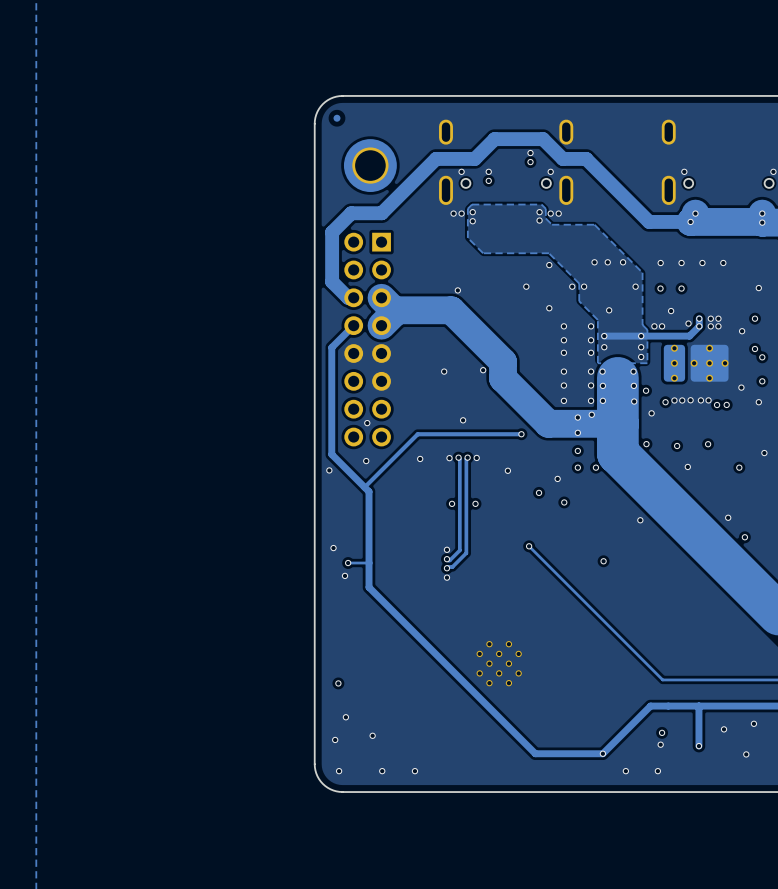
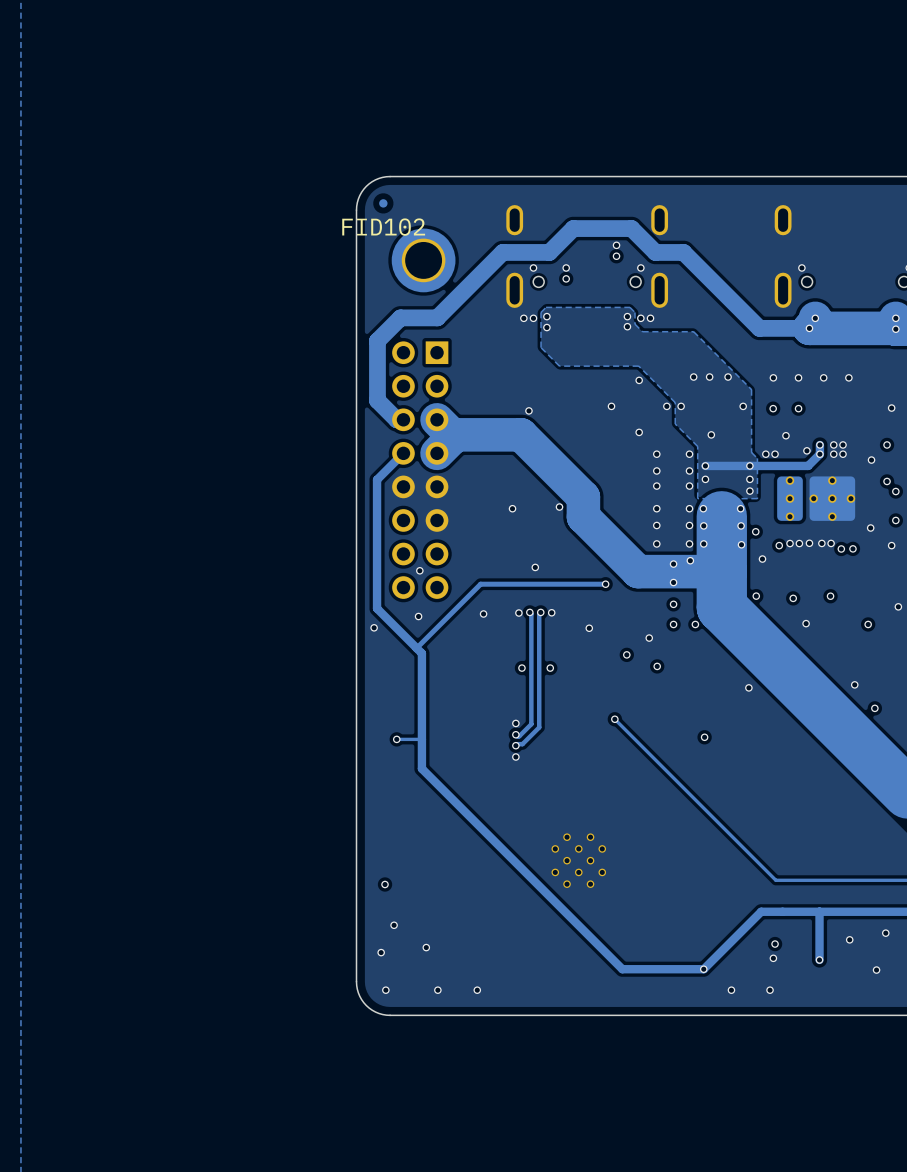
FID102 name: none -> FID102 (383, 227)
via: (333, 548) -> none
via: (345, 575) -> none

